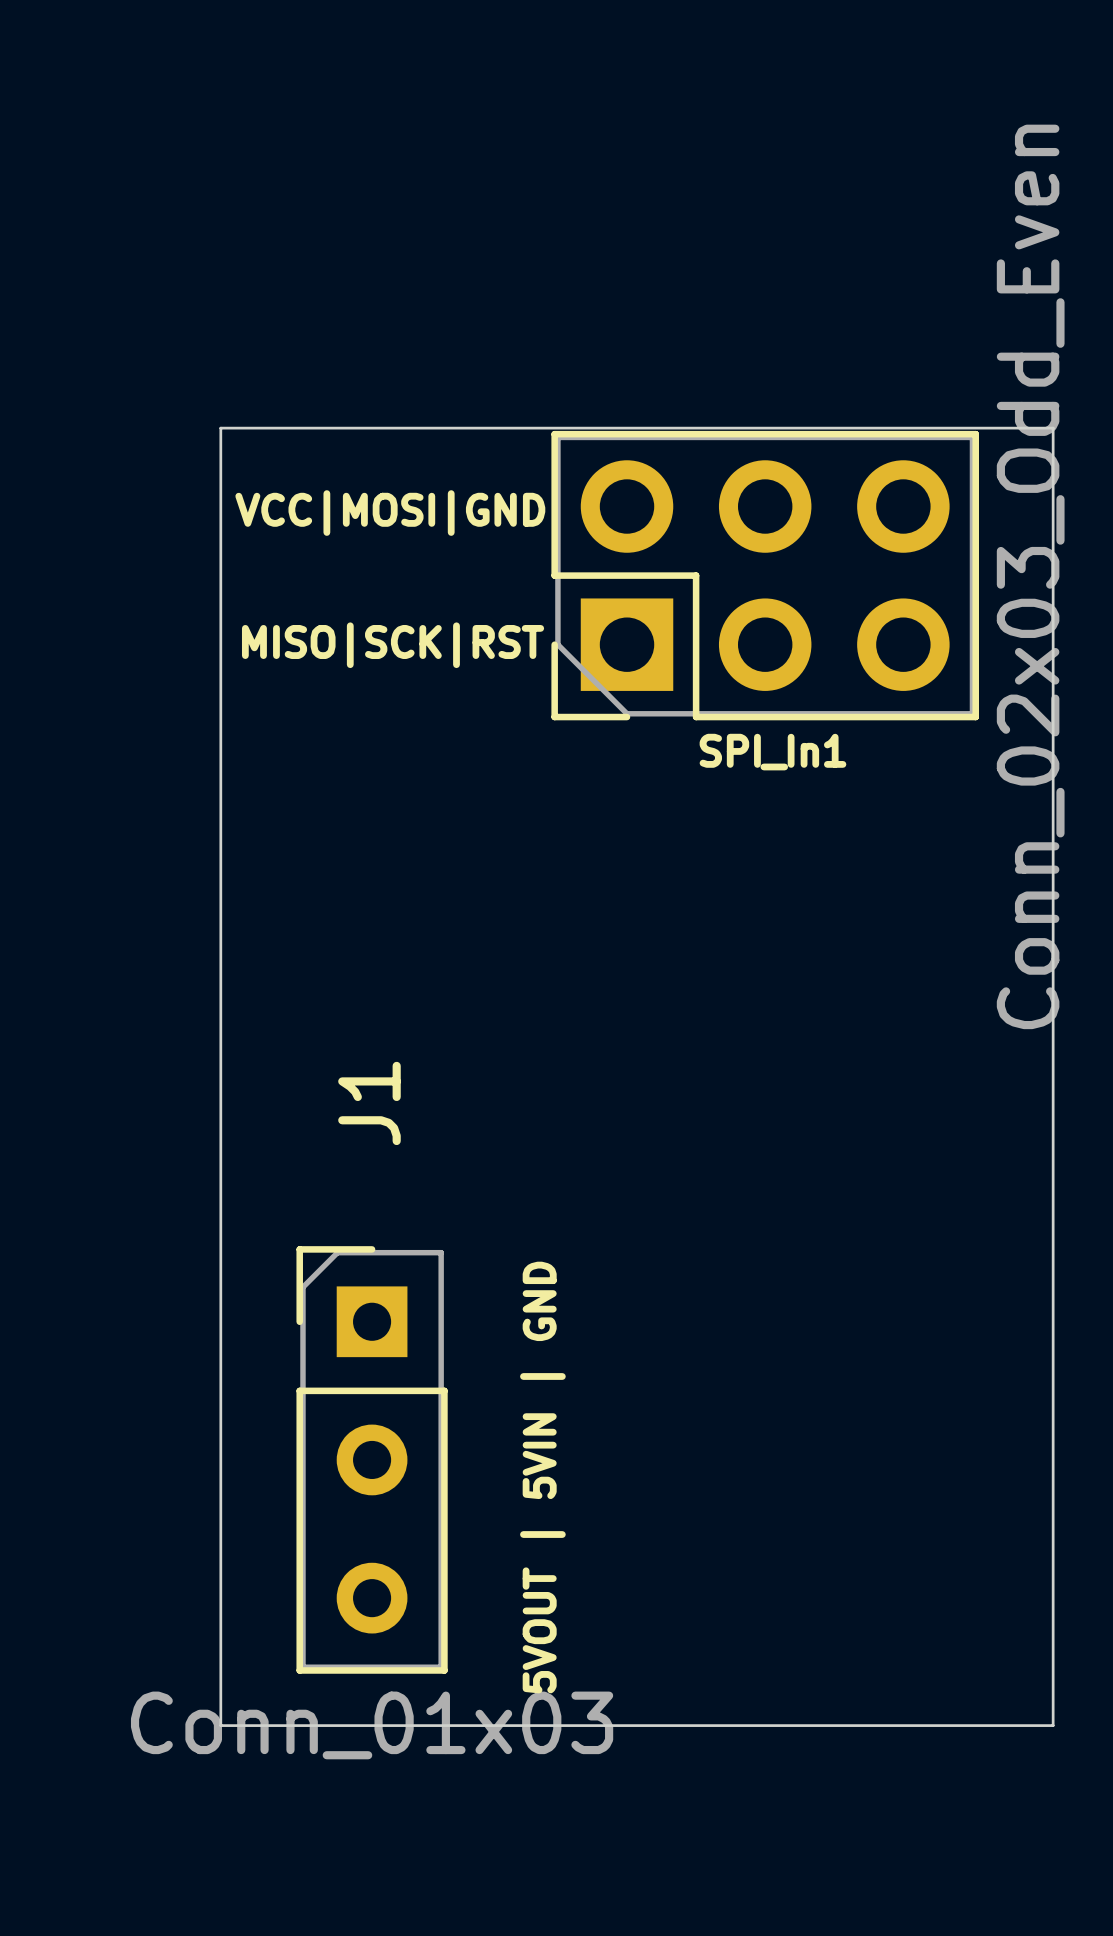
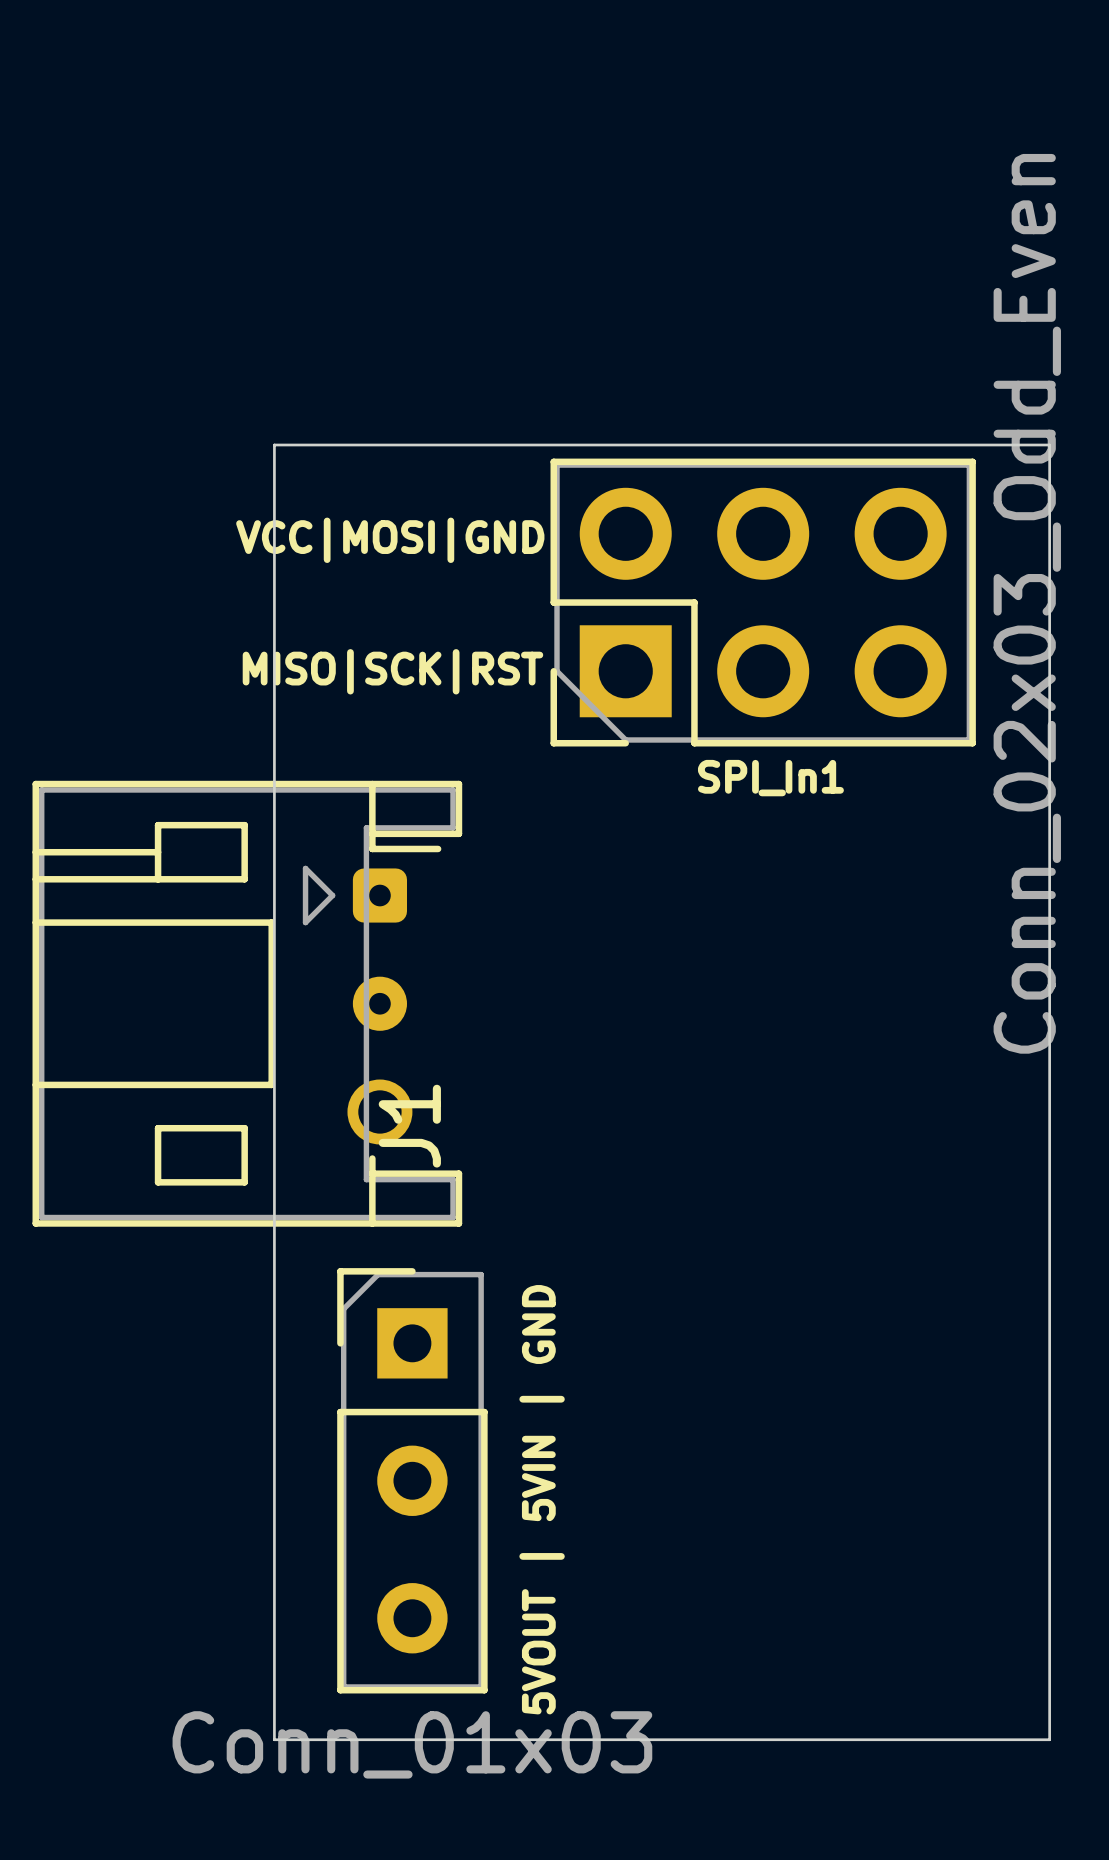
board edge: (1053, 428) (220, 428) (220, 1725) (1053, 1725) (1053, 1718) -> (1049, 455) (1049, 445) (274, 445) (274, 1739) (1049, 1739)
part: none -> (247, 1003)
J1 position: (372, 1459) -> (412, 1480)

